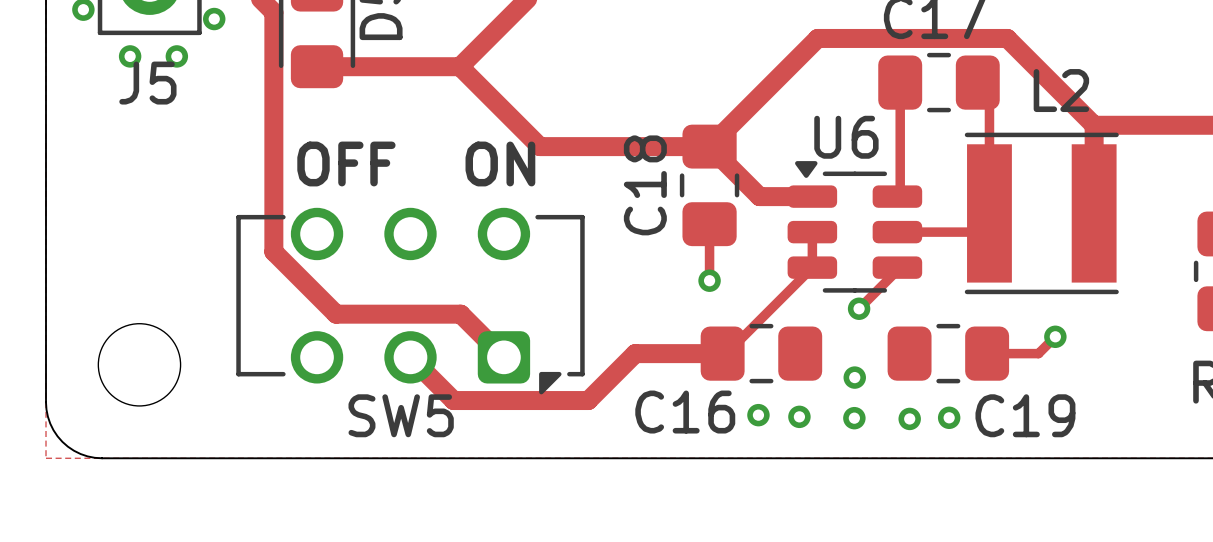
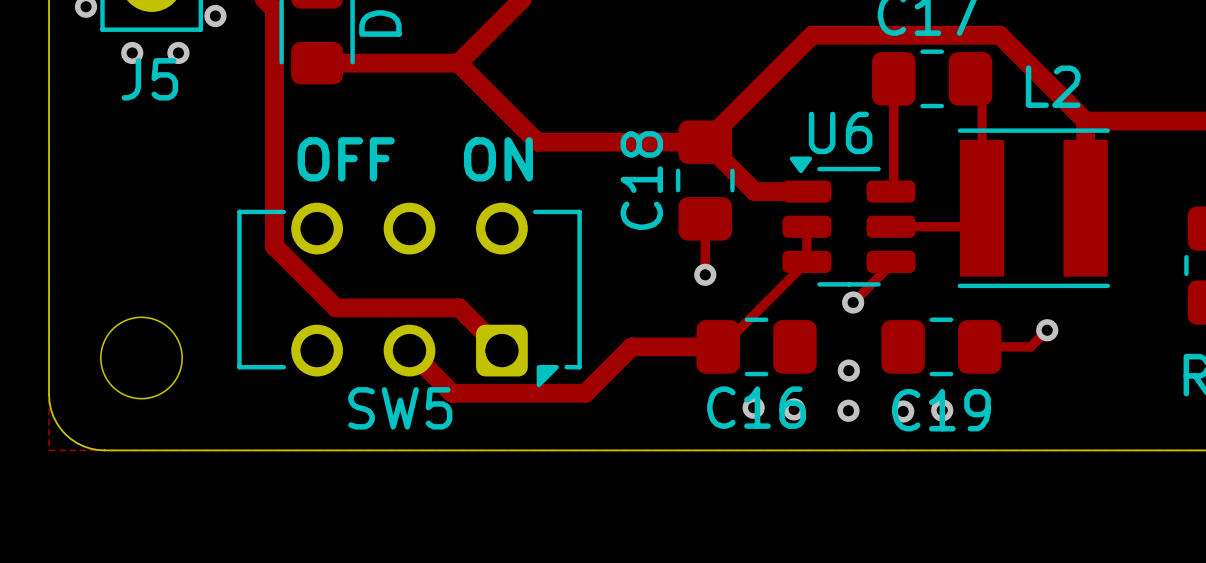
C16 name position: C16 (685, 412) -> C16 (756, 407)
C19 name position: C19 (1025, 415) -> C19 (941, 410)

